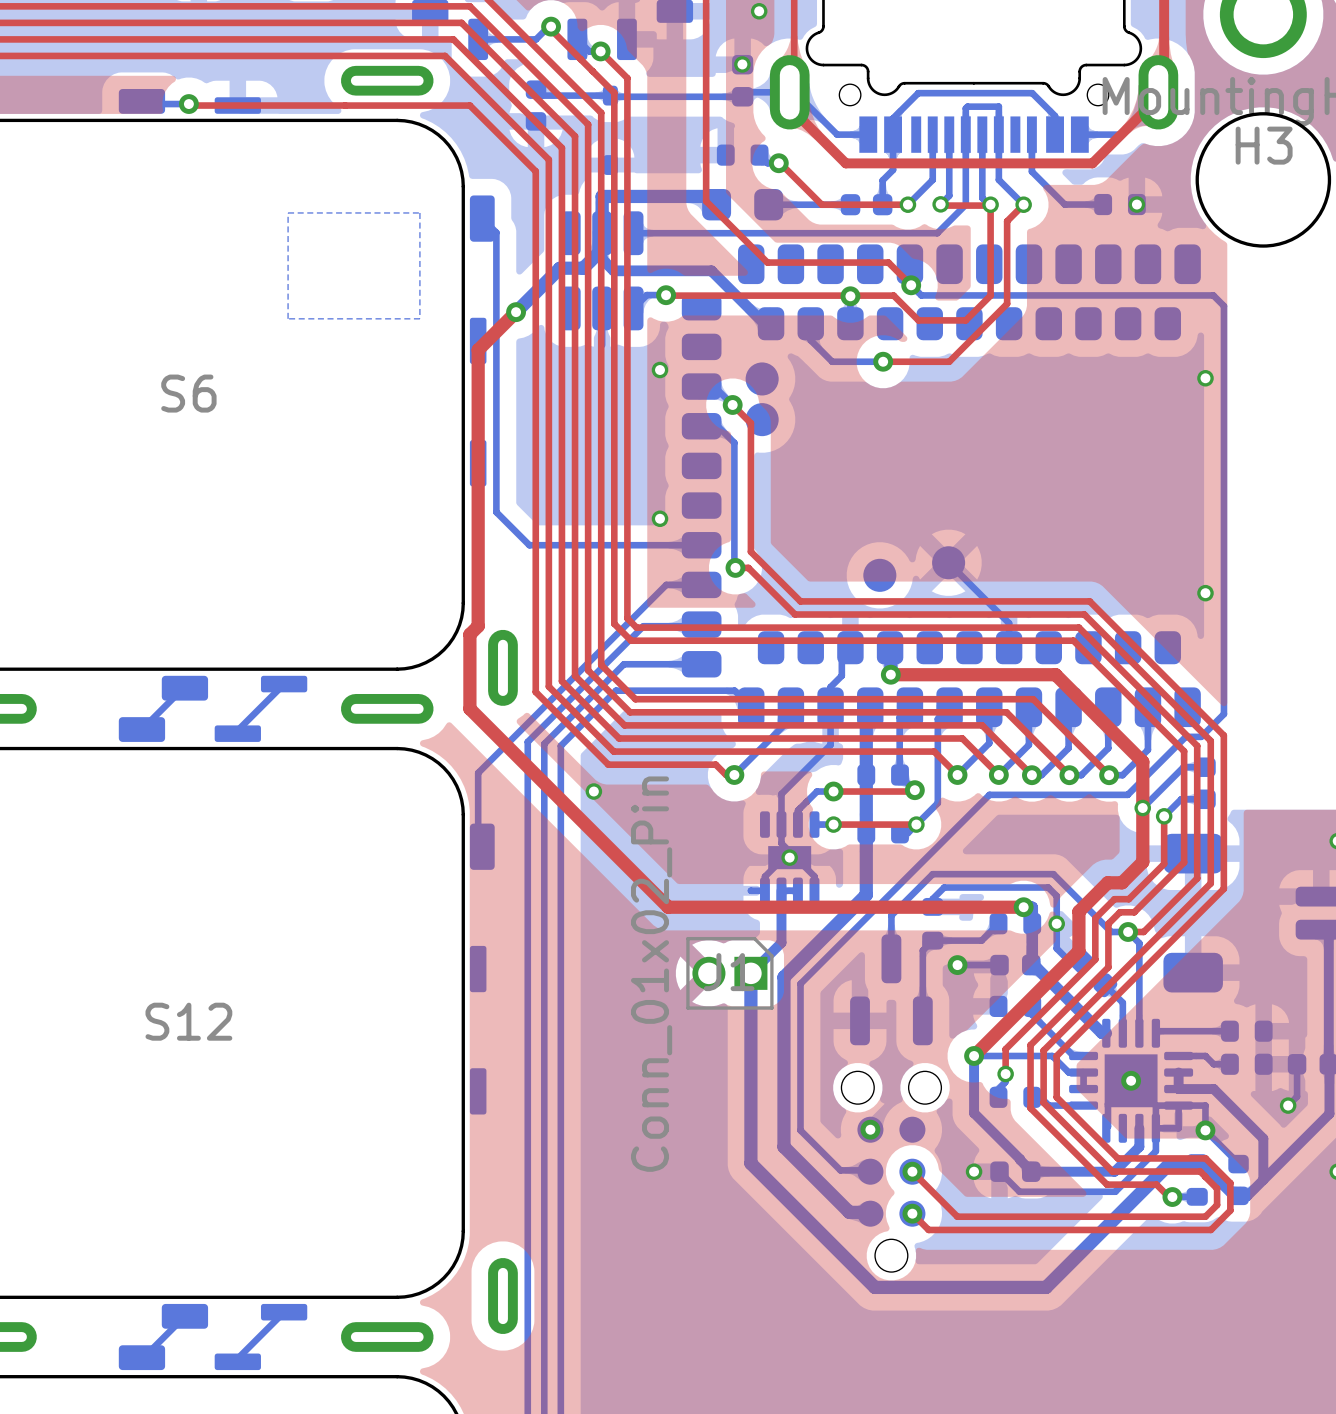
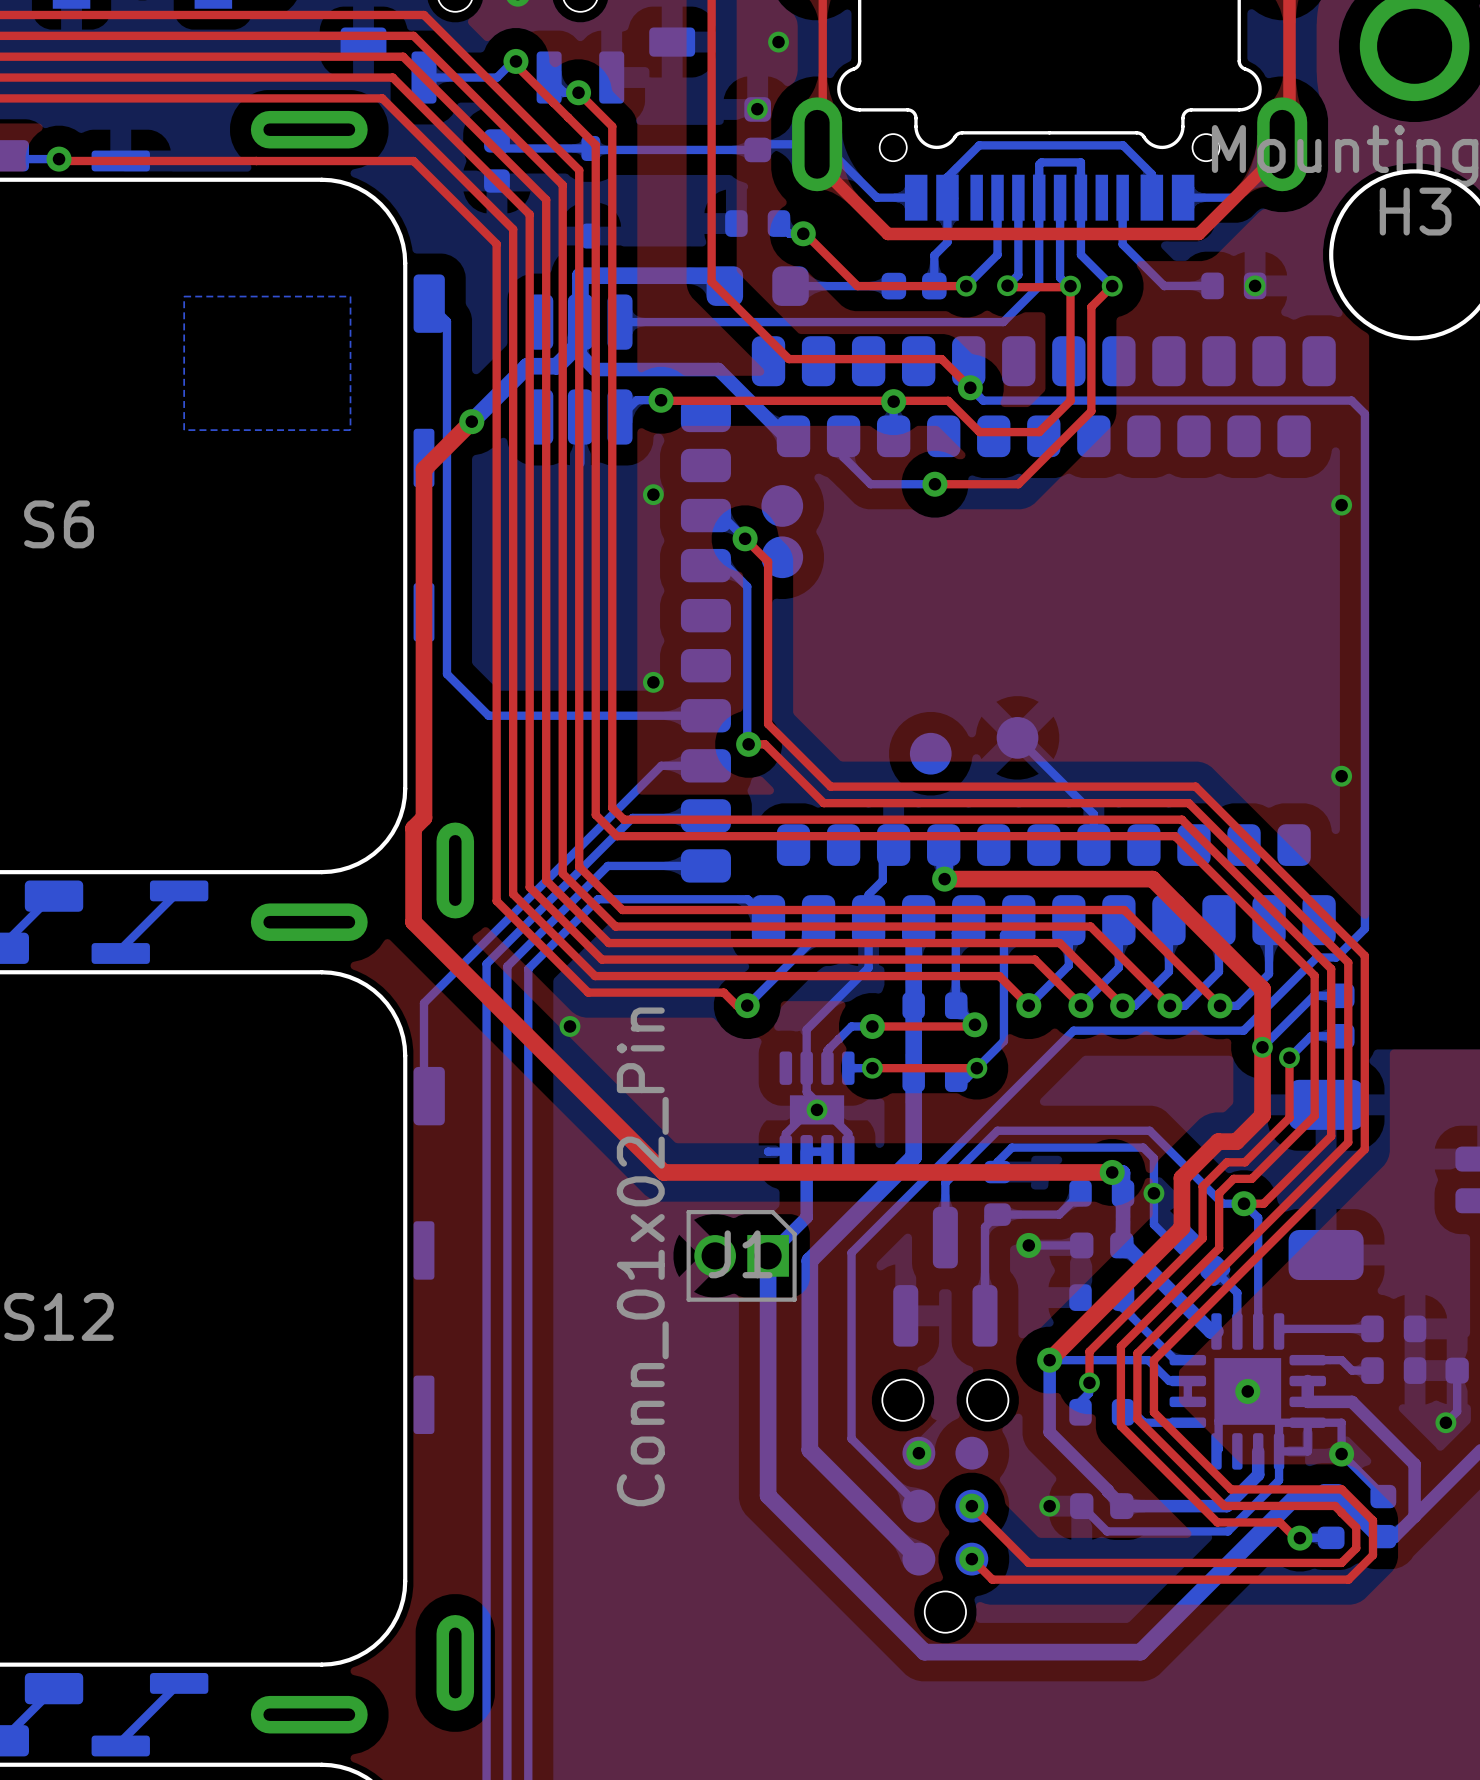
bottom track: (993, 794) (989, 794) (800, 983) (800, 1130) (840, 1170) (869, 1170) -> (1073, 1030) (851, 1252) (851, 1438) (917, 1504)
bottom track: (783, 1127) (783, 1146) (849, 1212) (869, 1212) -> (809, 1450) (917, 1557)

